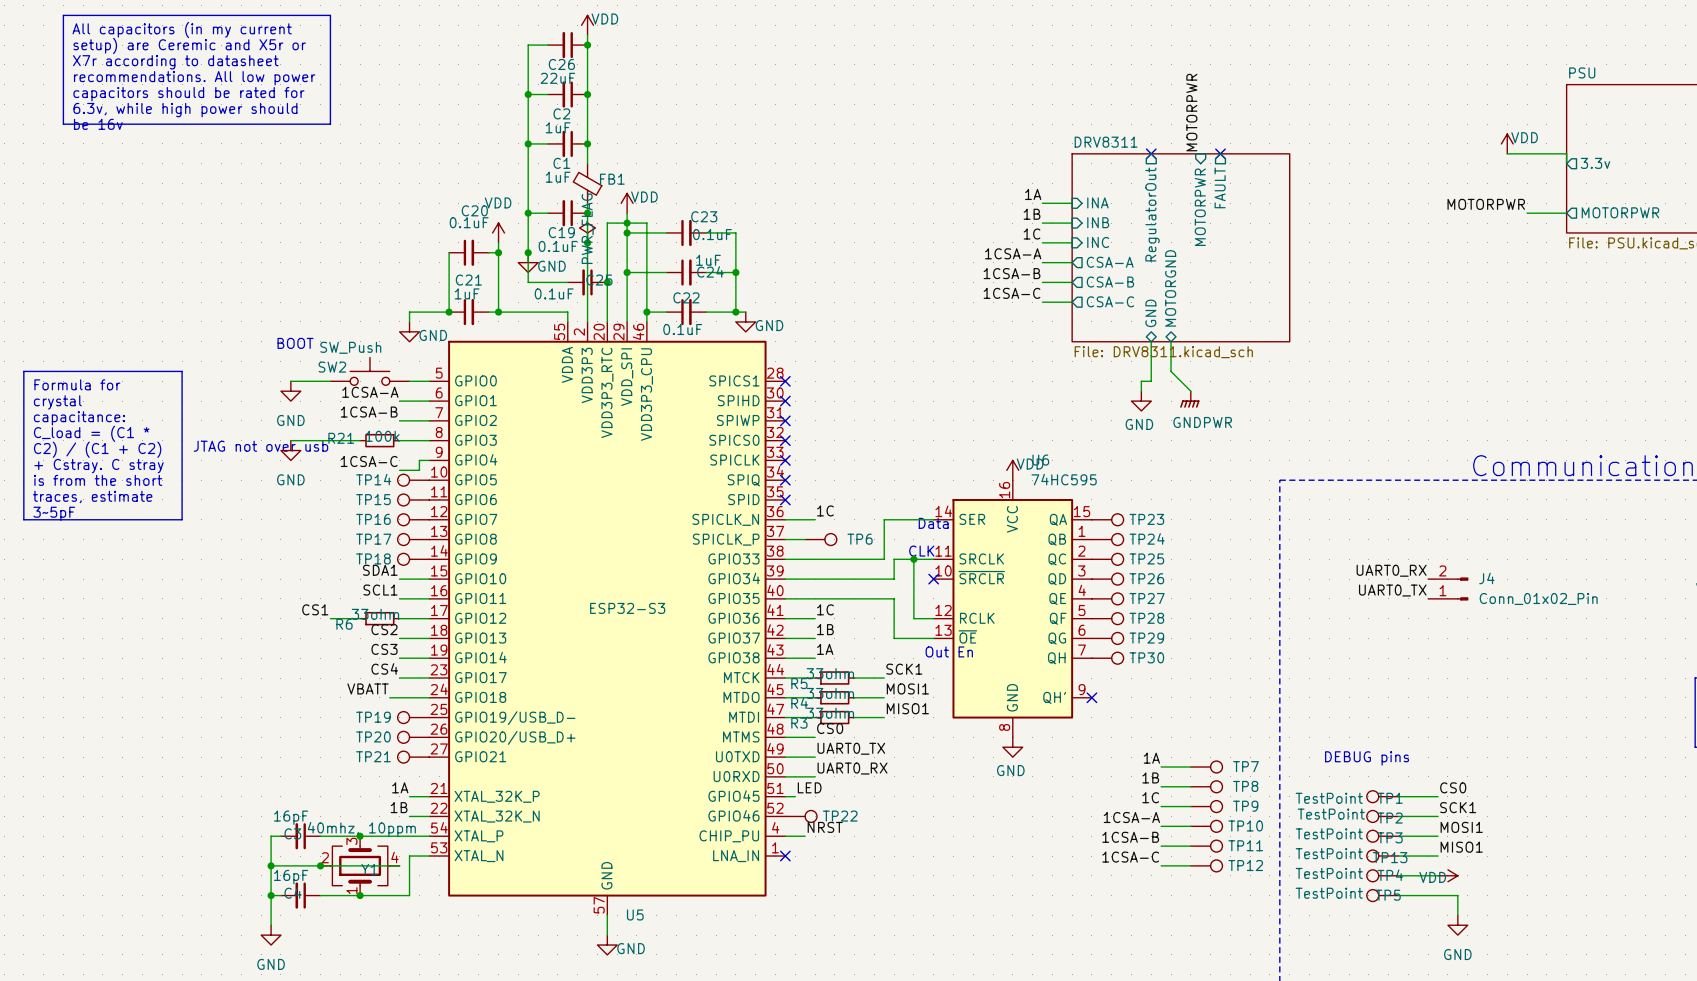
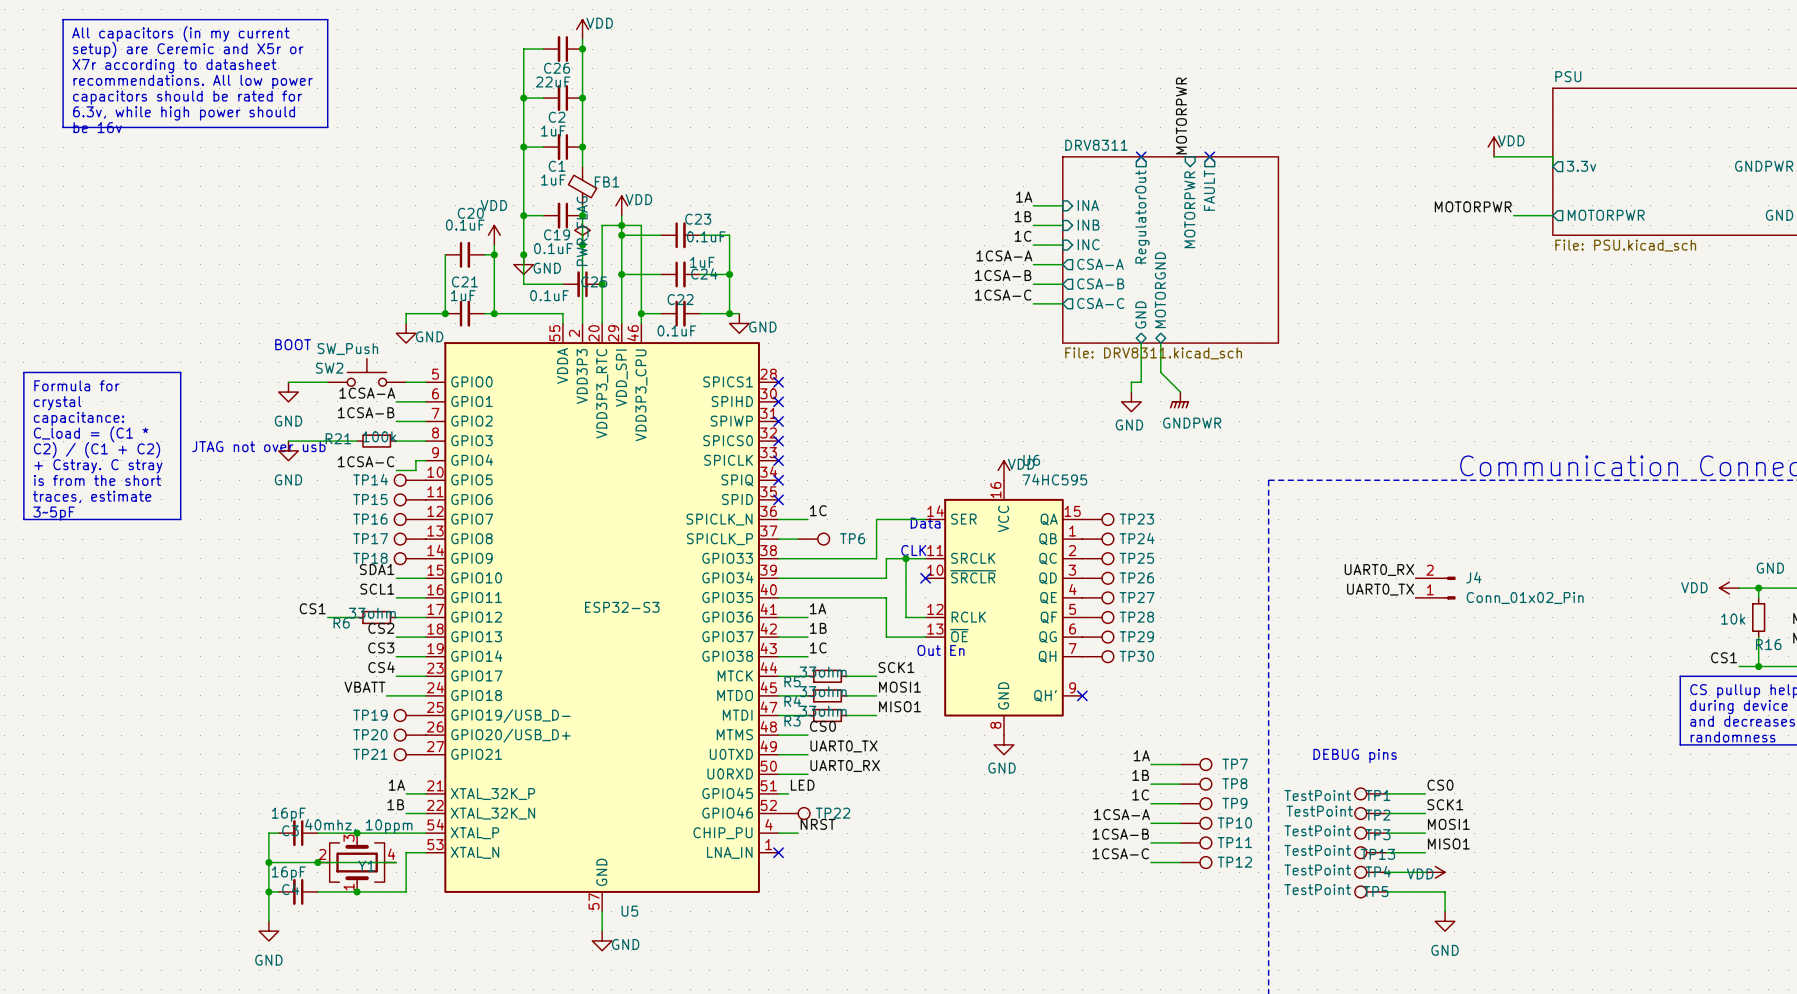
label: 1C (825, 609) -> 1A (818, 608)
label: 1A (825, 649) -> 1C (818, 647)

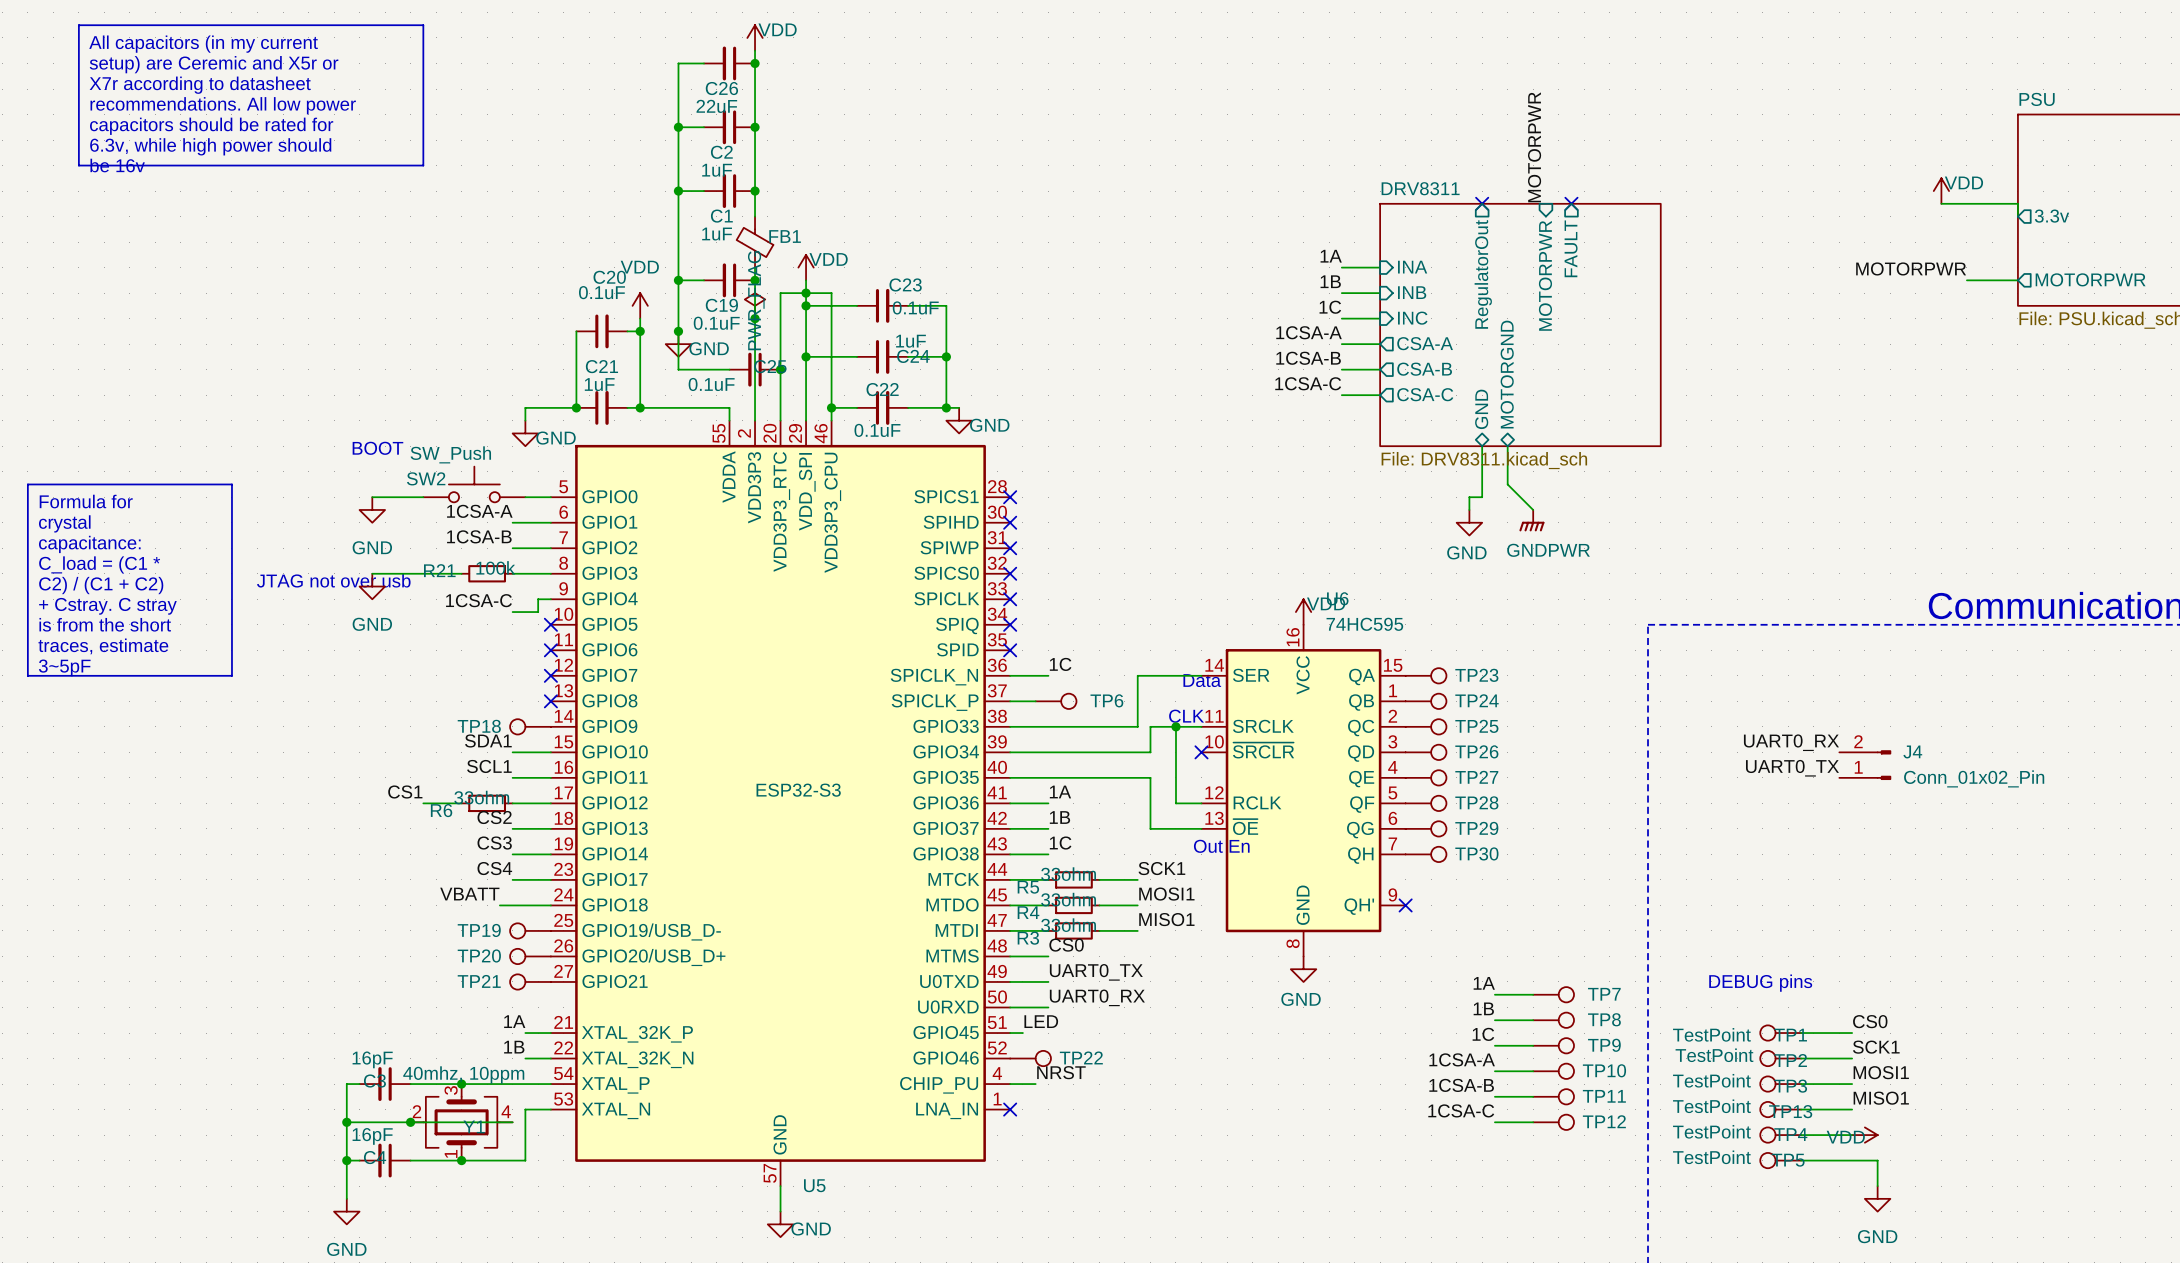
TP14: (410, 480) -> none
no-connect mark: none -> (550, 624)
TP15: (410, 499) -> none
no-connect mark: none -> (550, 650)
TP16: (410, 519) -> none
no-connect mark: none -> (550, 675)
TP17: (410, 539) -> none
no-connect mark: none -> (550, 701)

